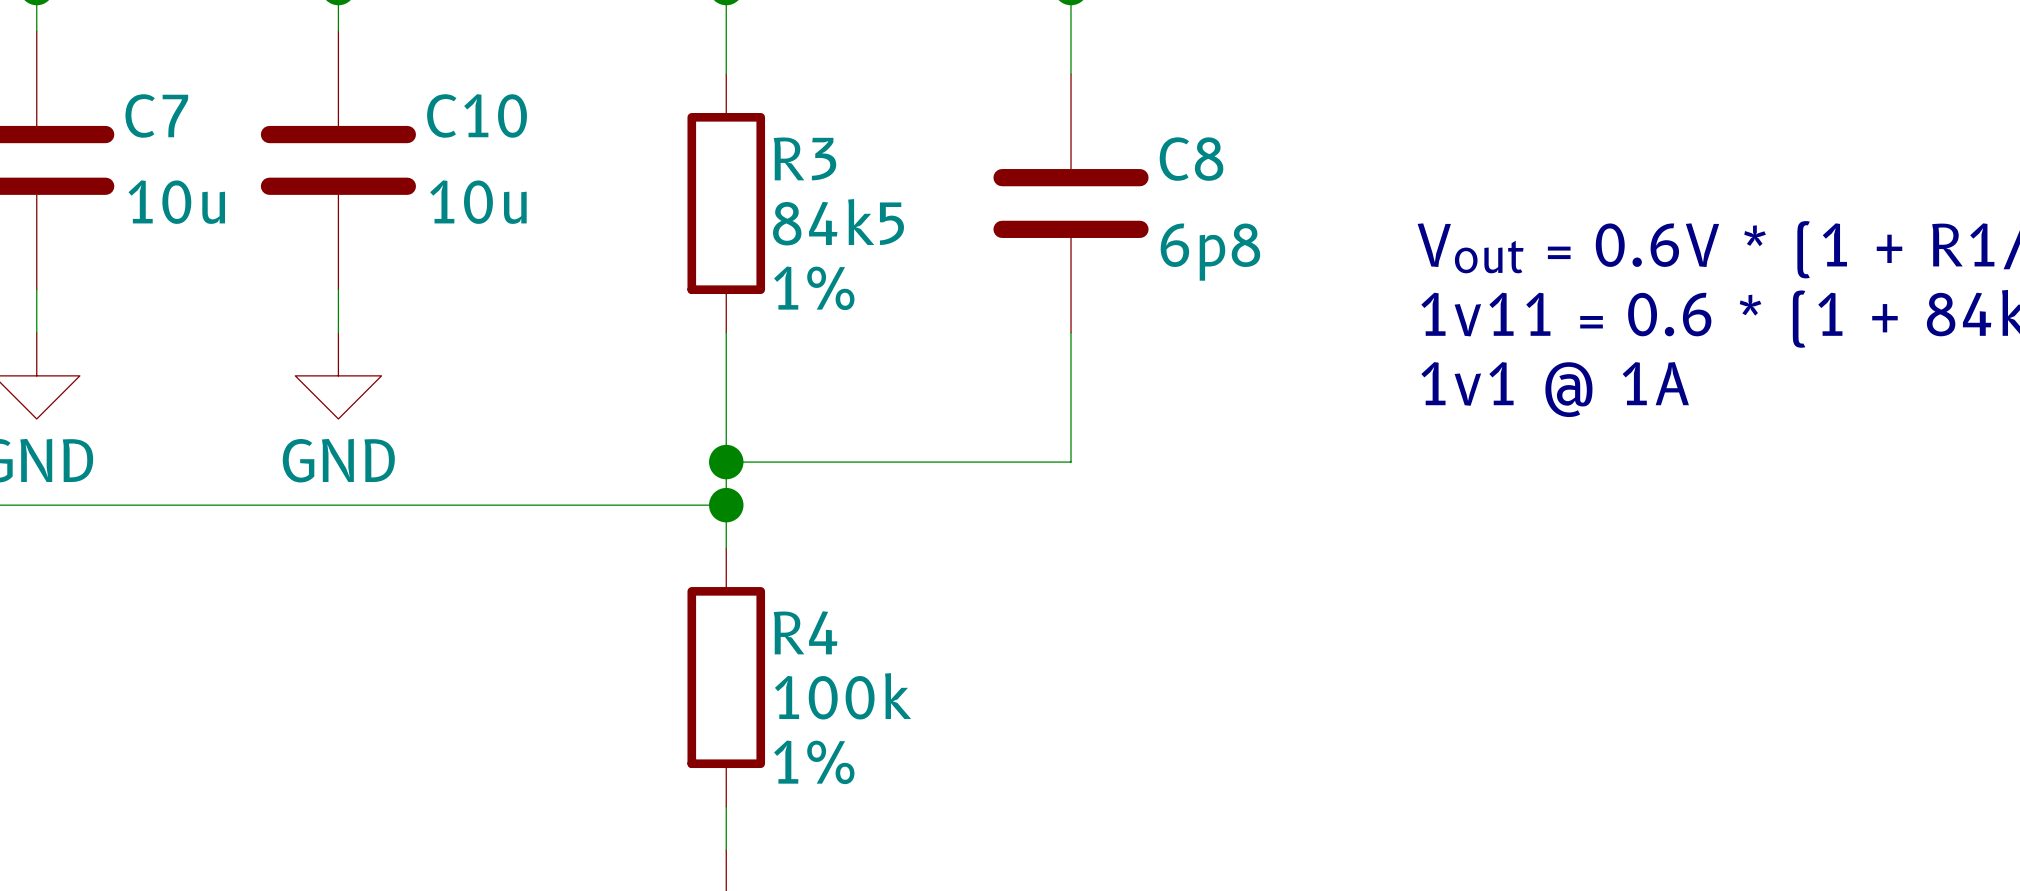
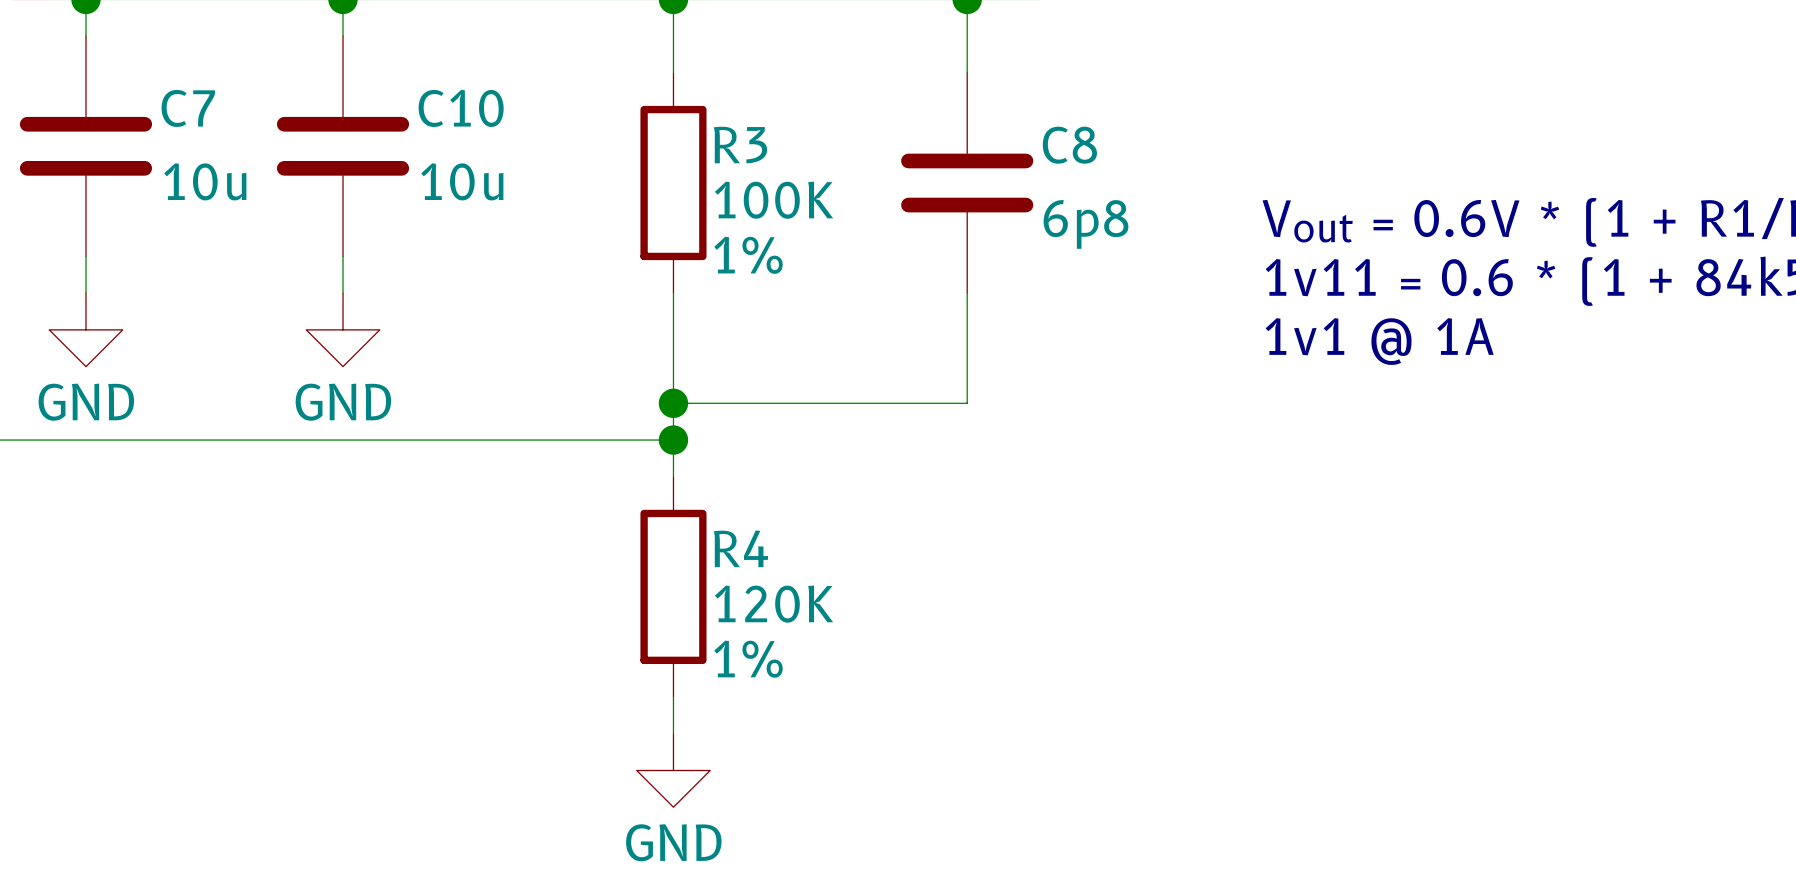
R3 value: 84k5 (838, 222) -> 100K (774, 200)
R4 value: 100k (843, 696) -> 120K (774, 604)

